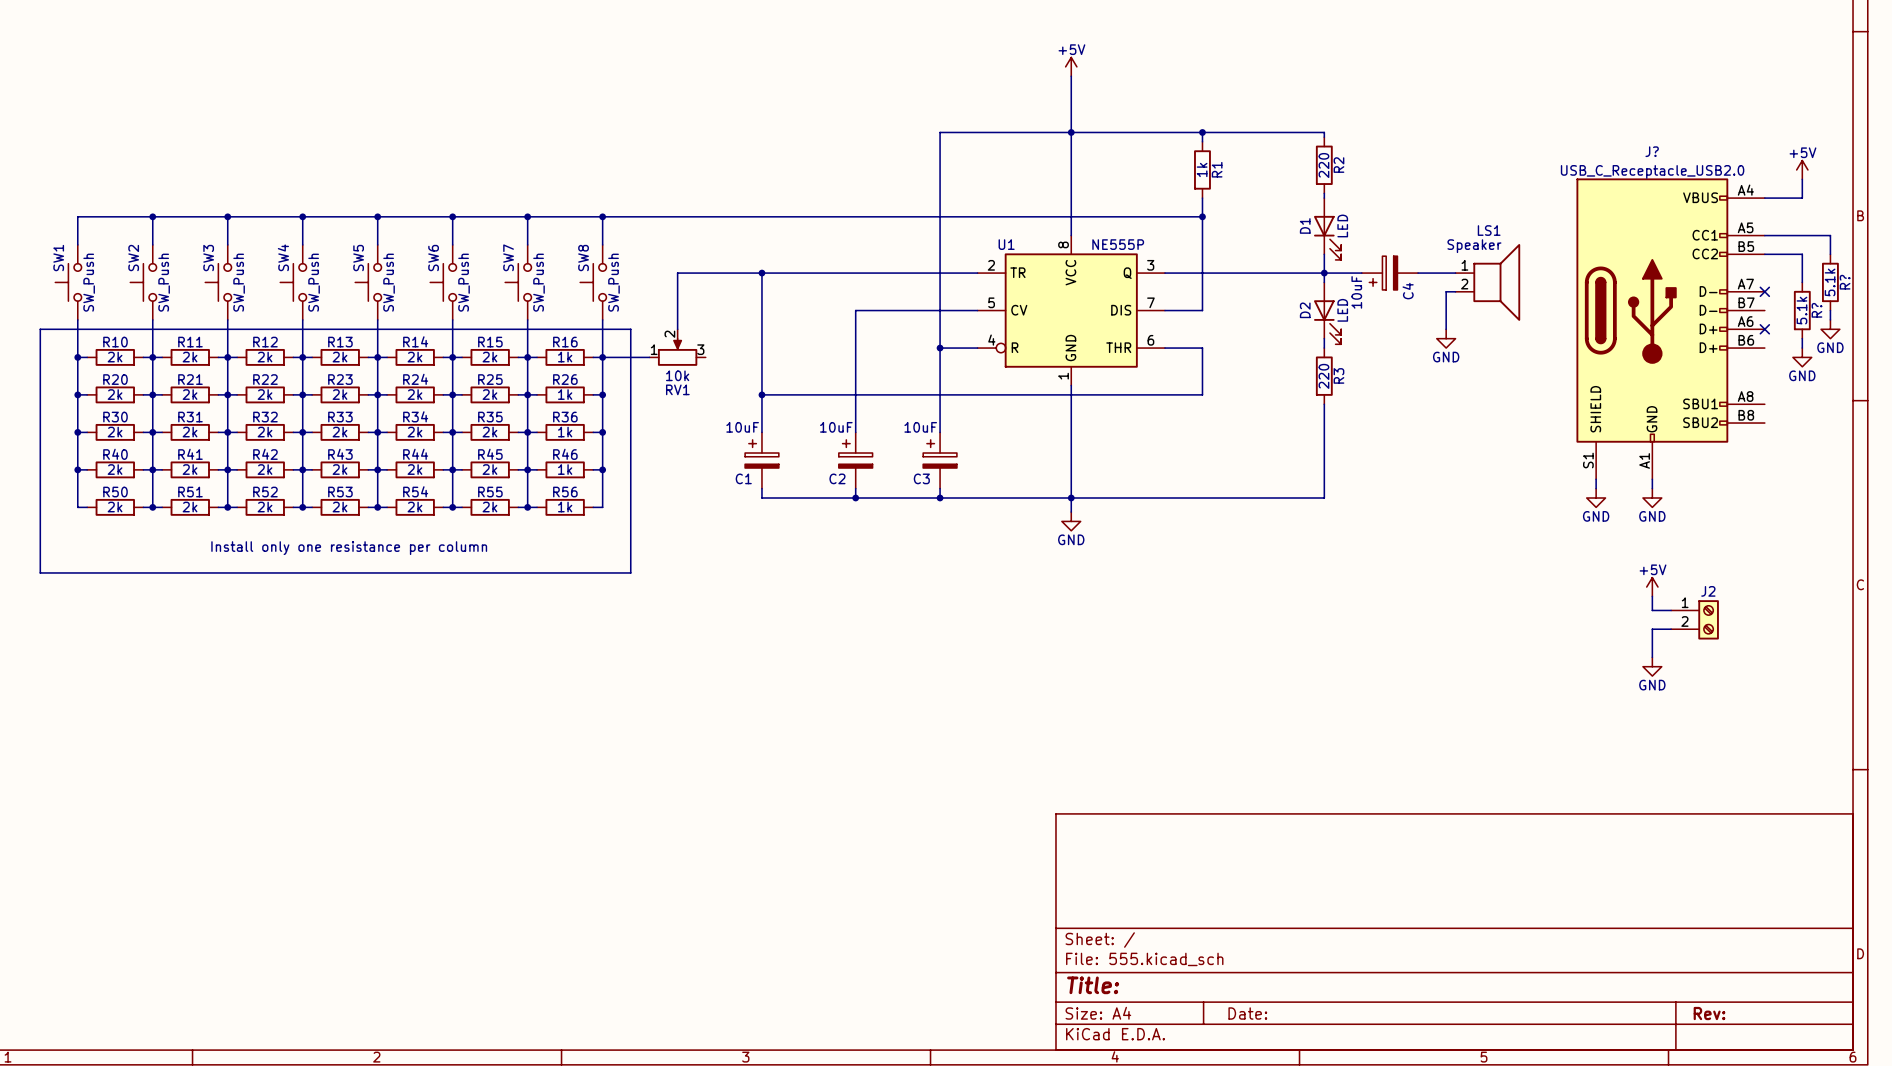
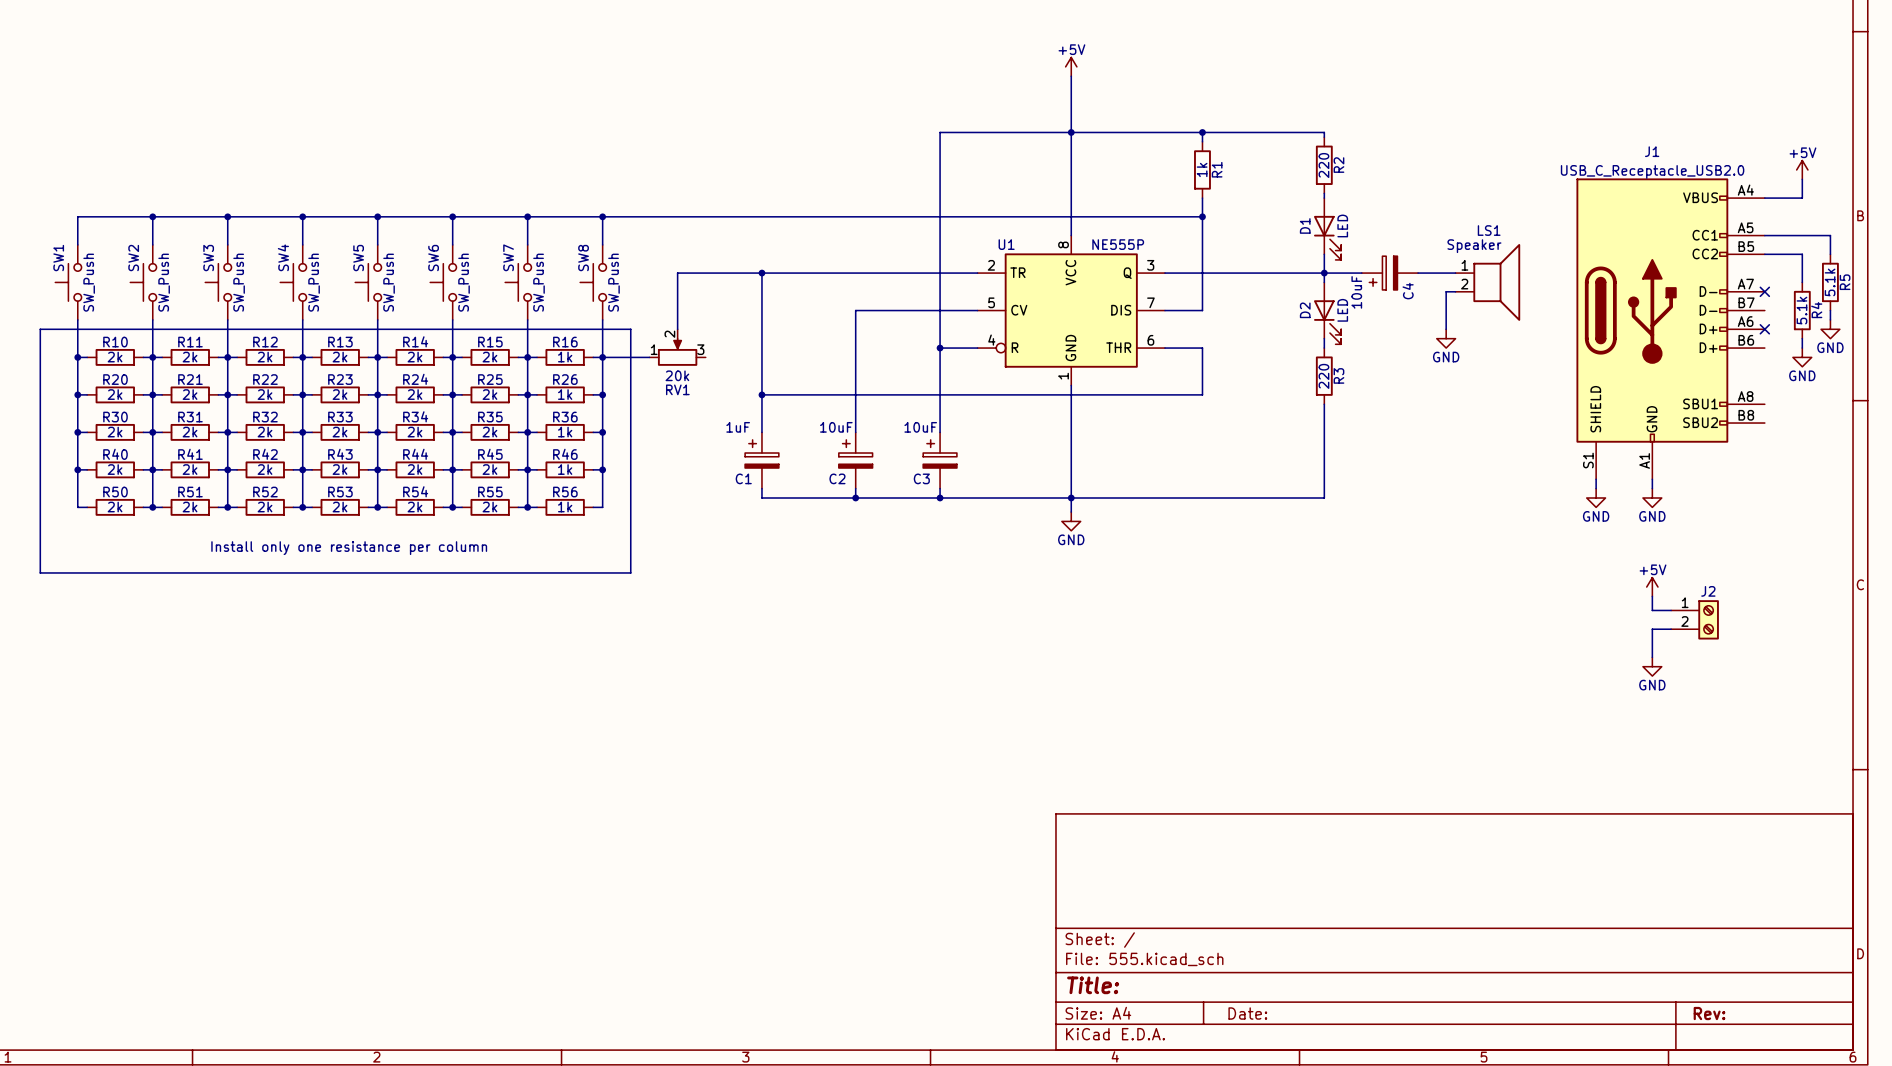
J? name: J? (1652, 151) -> J1 (1652, 151)
R? name: R? (1845, 282) -> R5 (1845, 282)
R? name: R? (1816, 310) -> R4 (1816, 310)
RV1 value: 10k (677, 375) -> 20k (677, 375)
C1 value: 10uF (742, 427) -> 1uF (738, 427)

